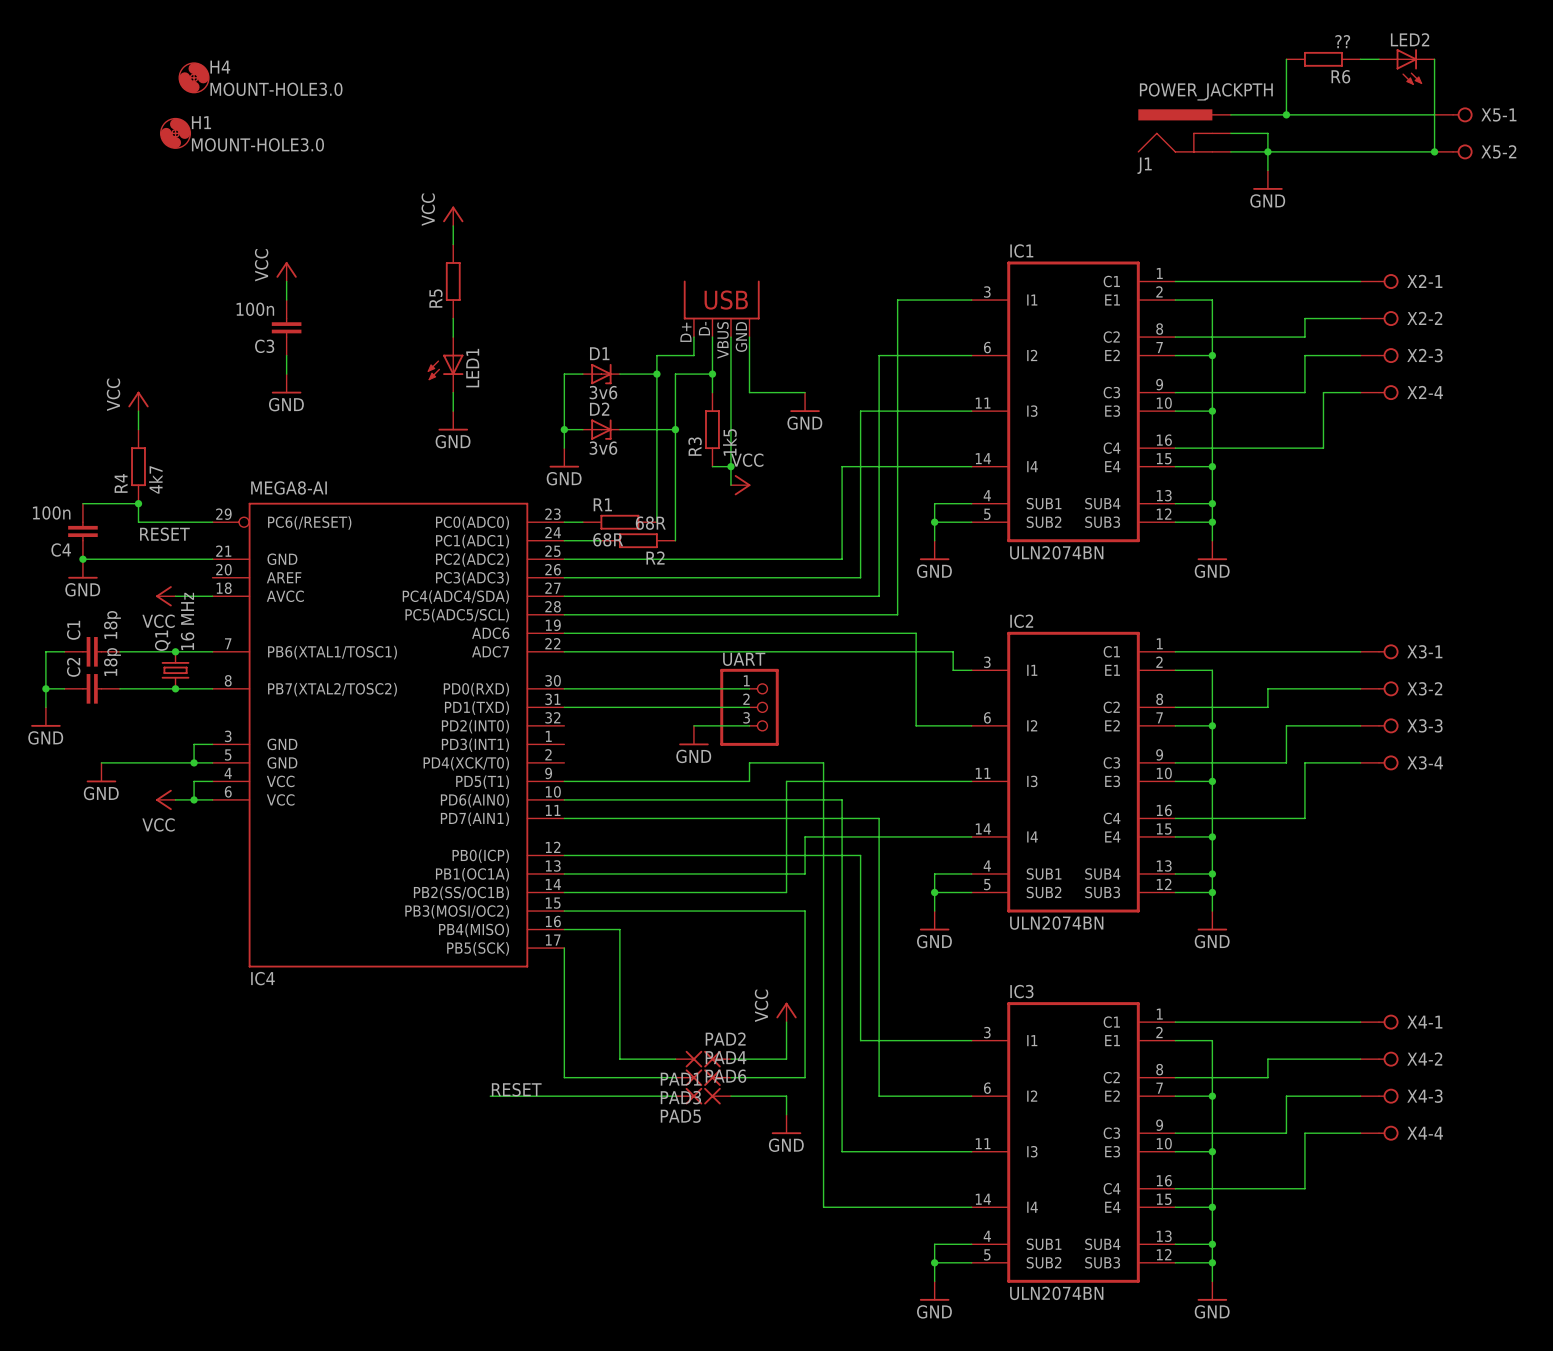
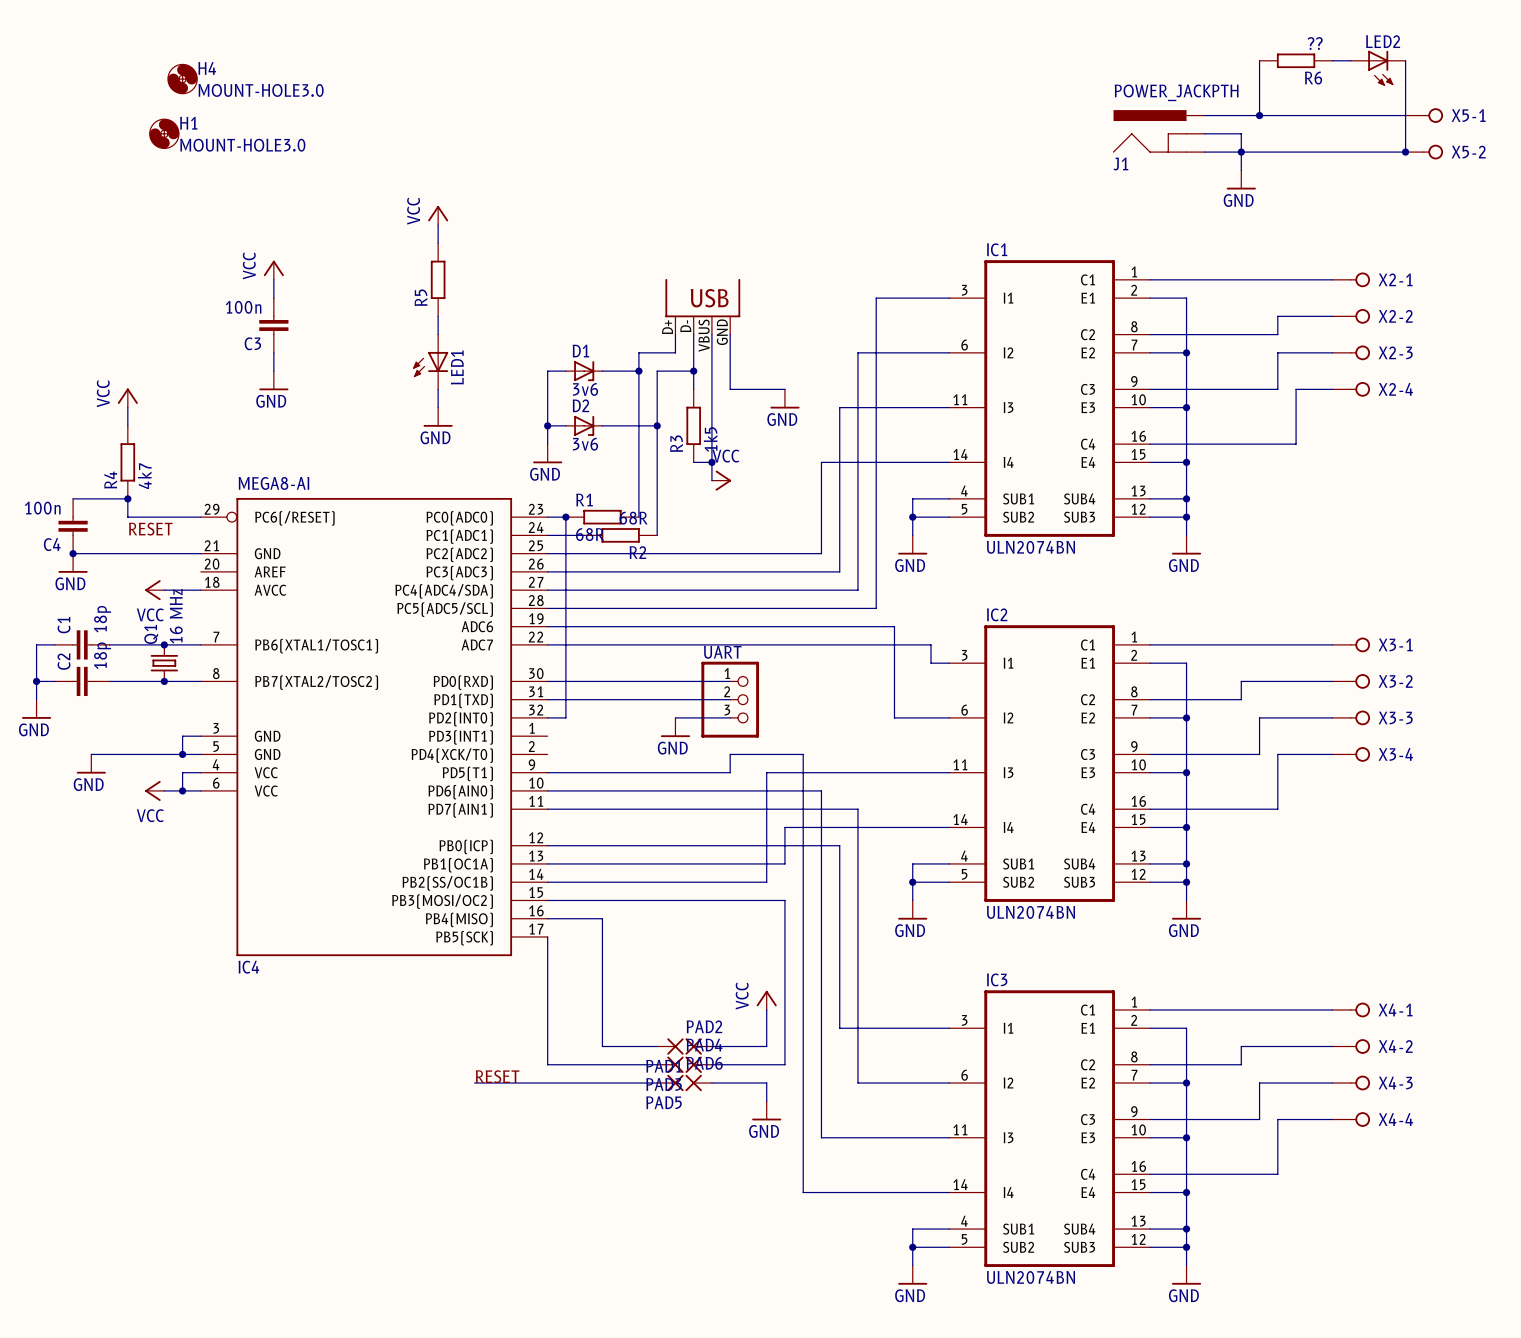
wire: none -> (565, 517) (565, 717) (547, 717)
junction: none -> (565, 517)

